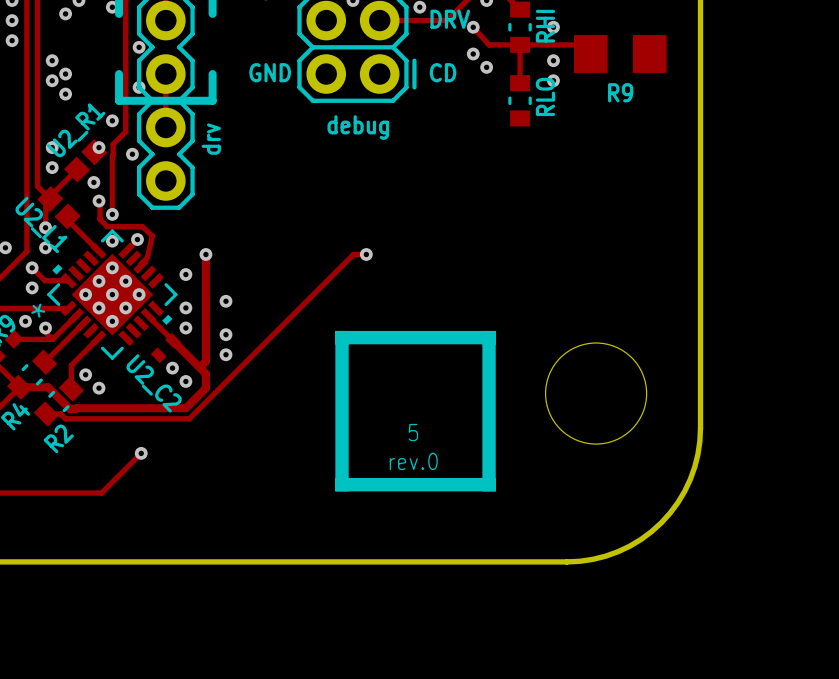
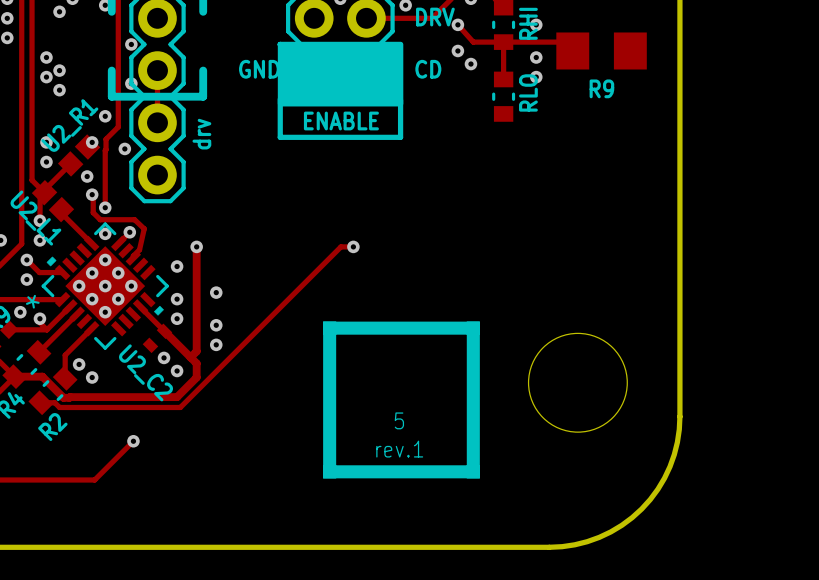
drawing: none -> [277, 41, 404, 107]
line: none -> (280, 99) (280, 137) (400, 137) (400, 100)
text: none -> ENABLE (341, 120)
part value: debug (358, 127) -> none
5 value: rev.0 (413, 461) -> rev.1 (399, 449)

